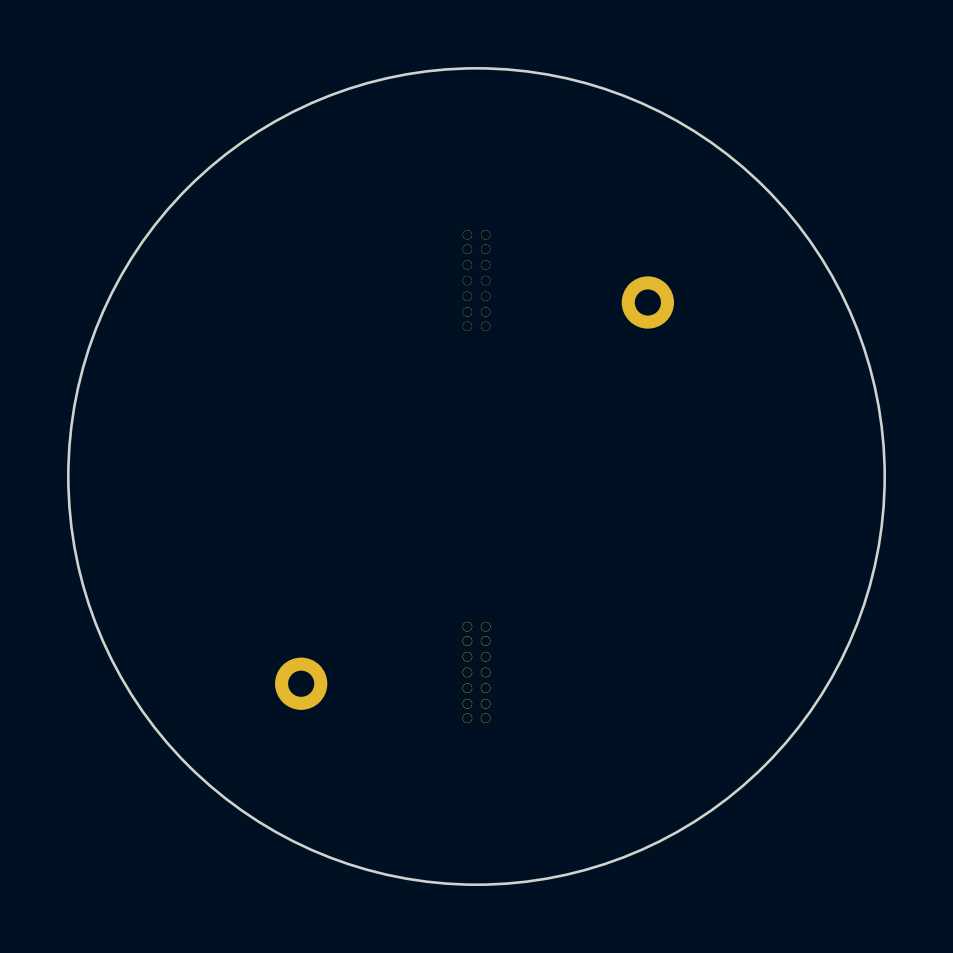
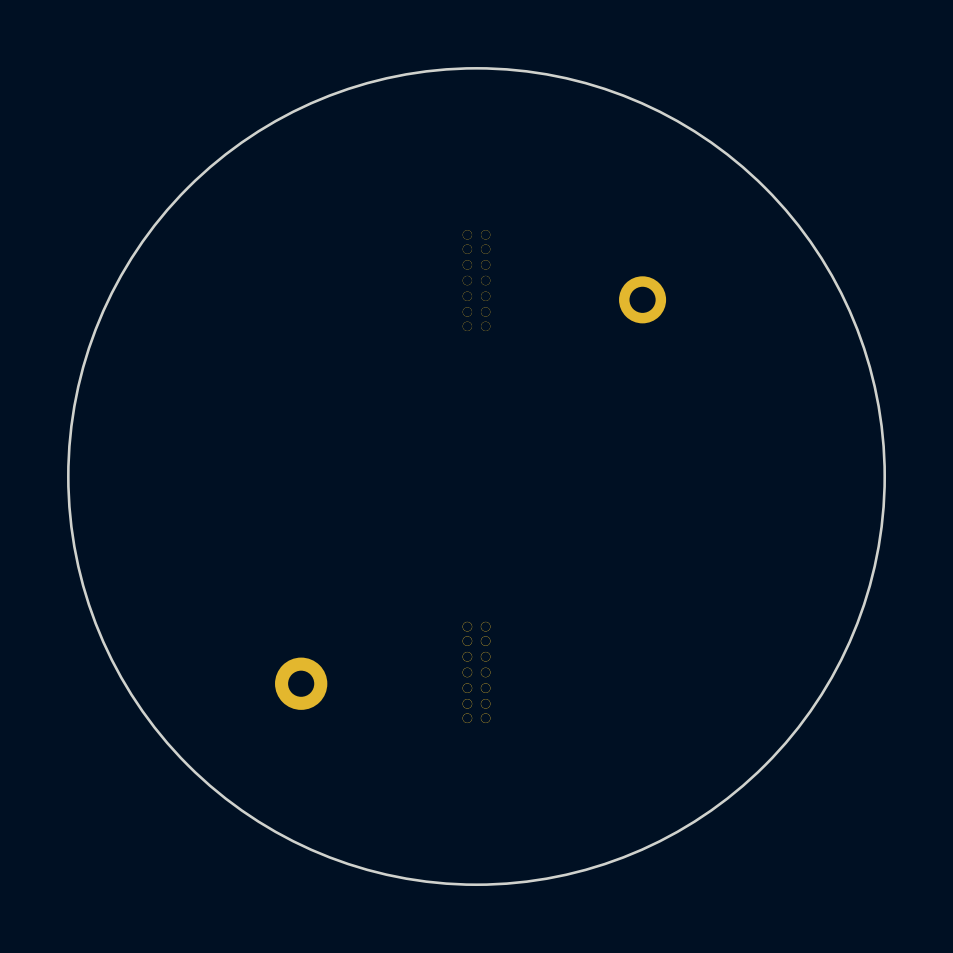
part footprint: [621, 276, 675, 329] -> [619, 276, 667, 324]

